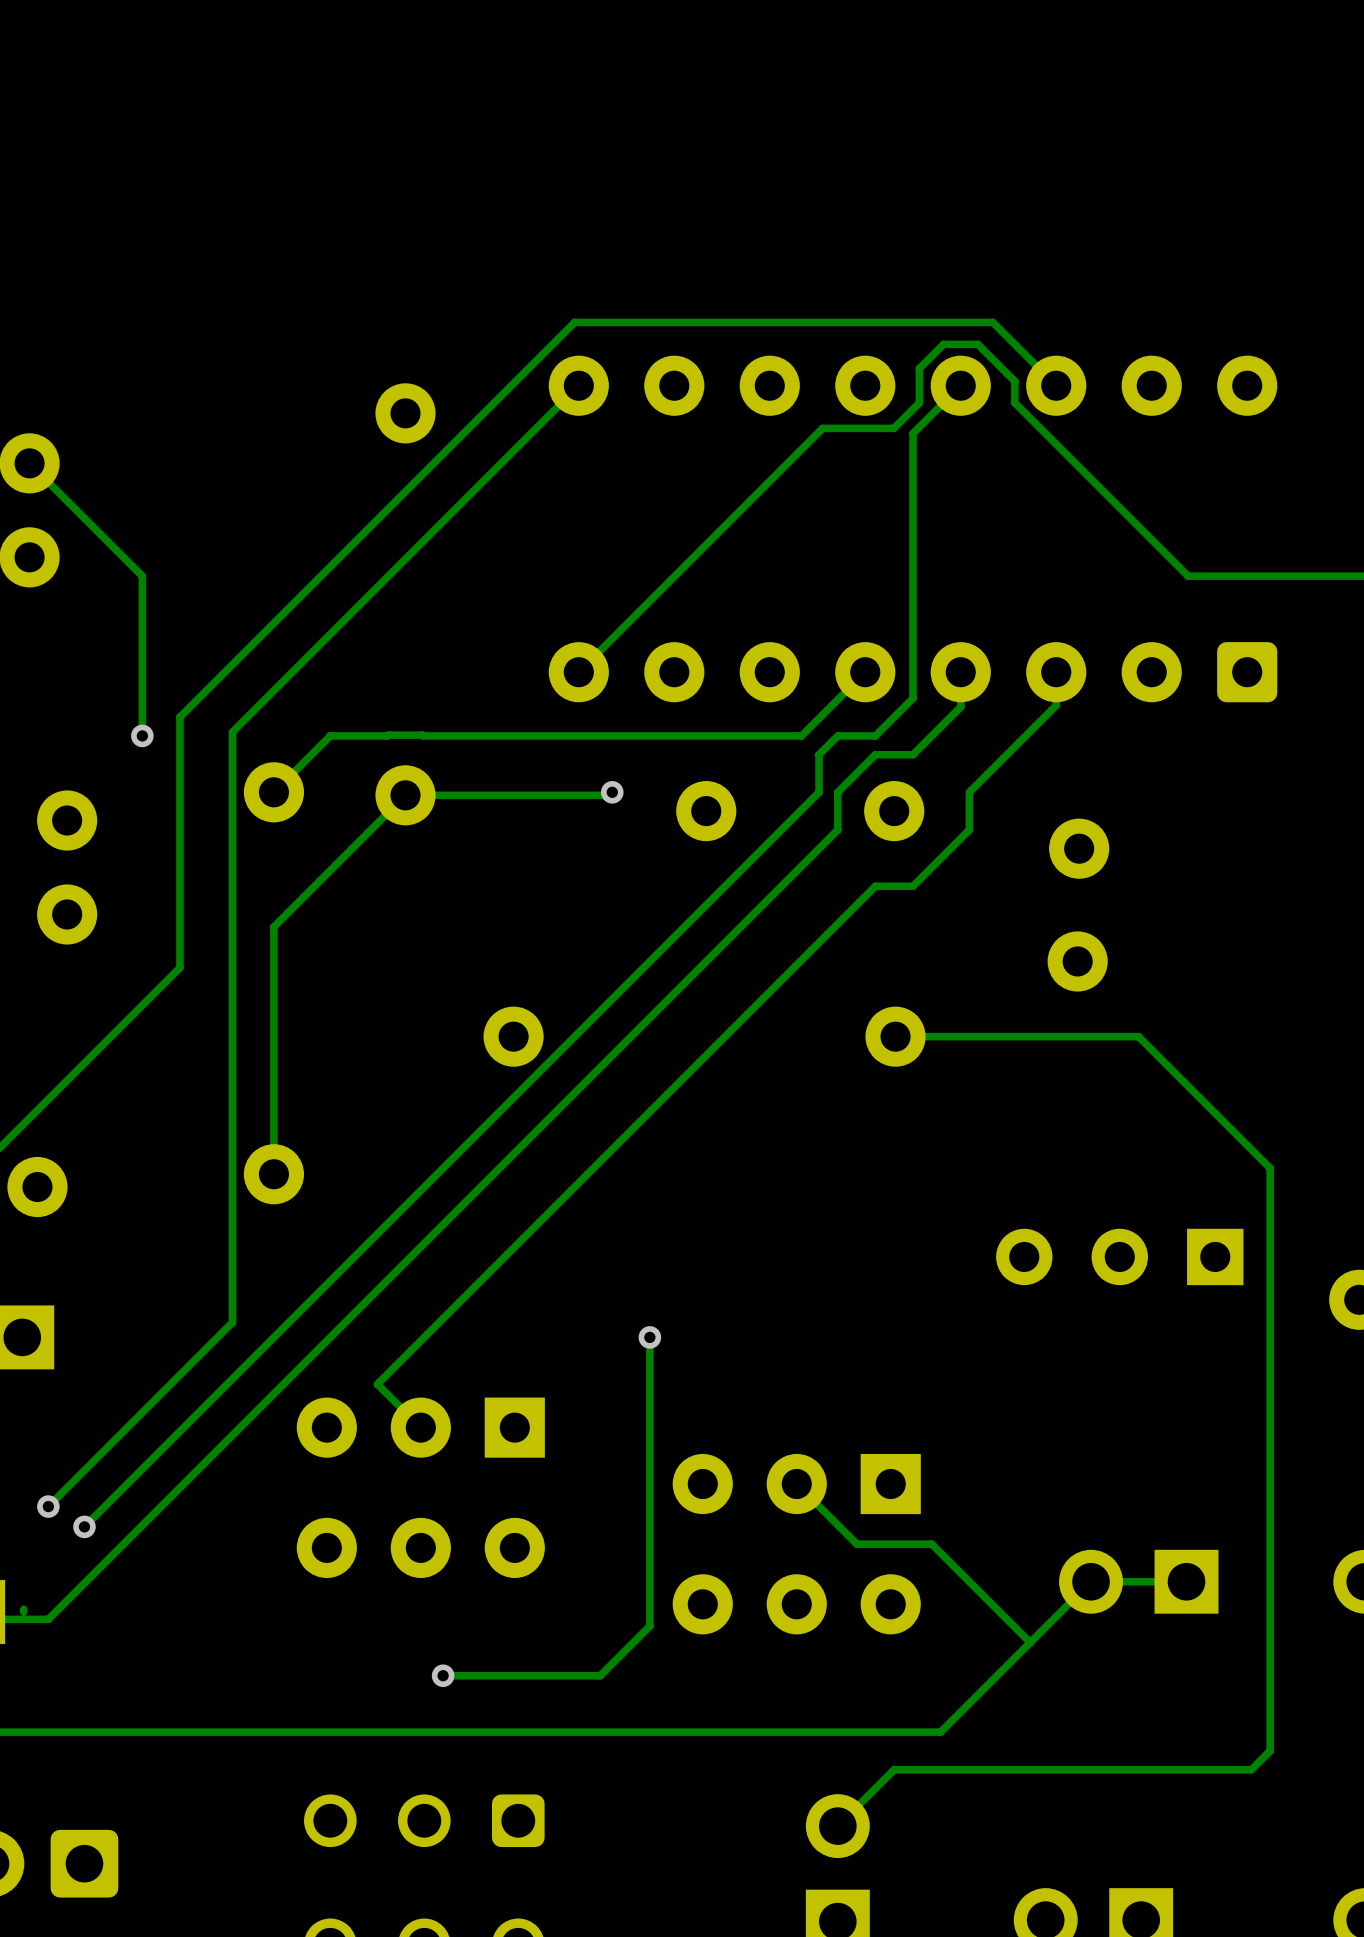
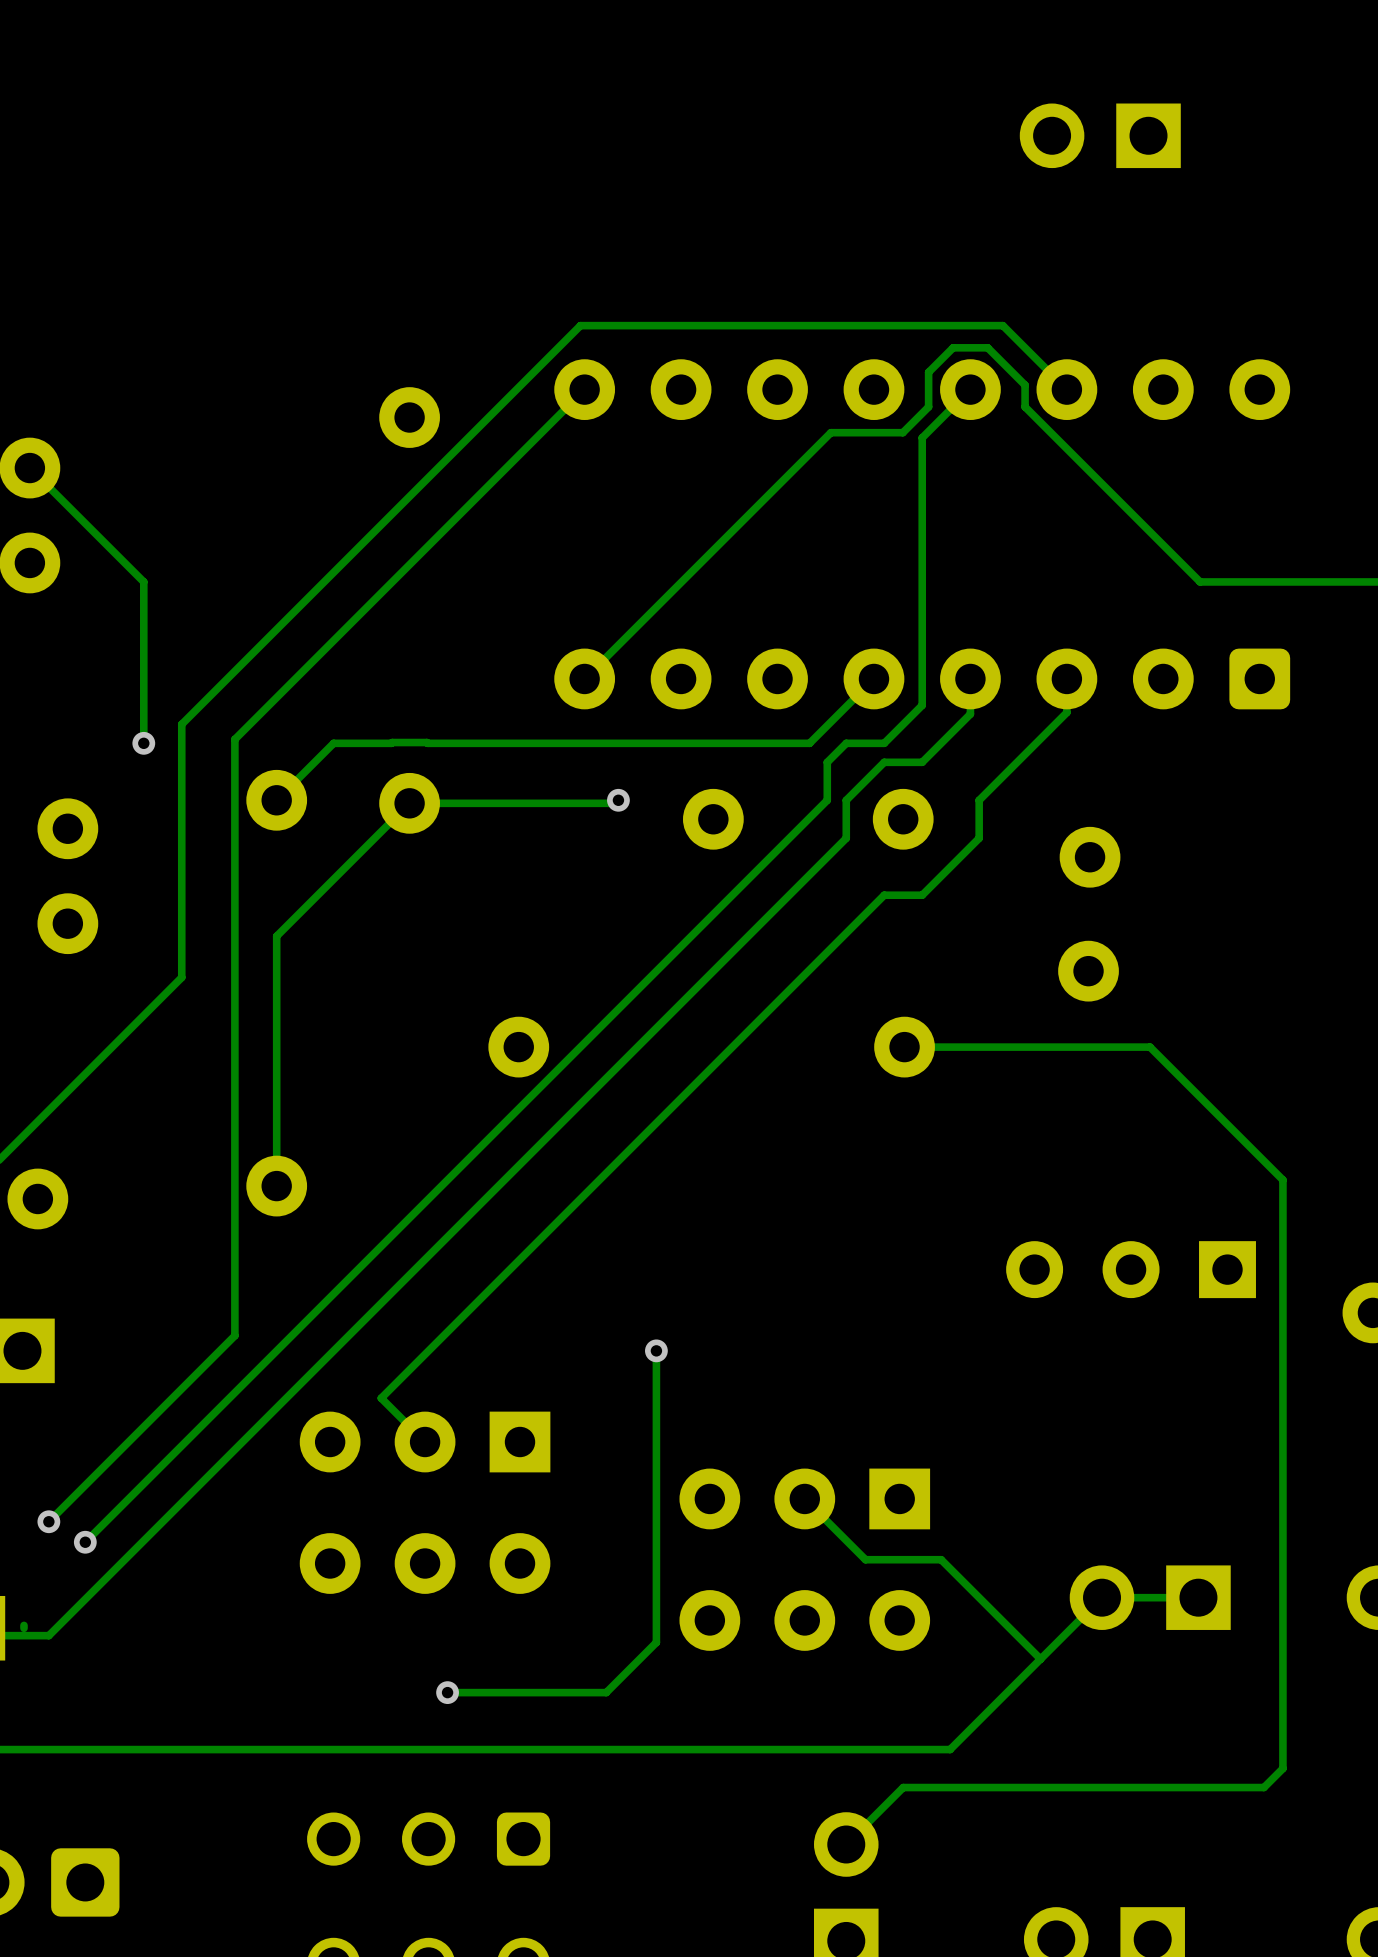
part: none -> (1100, 135)

